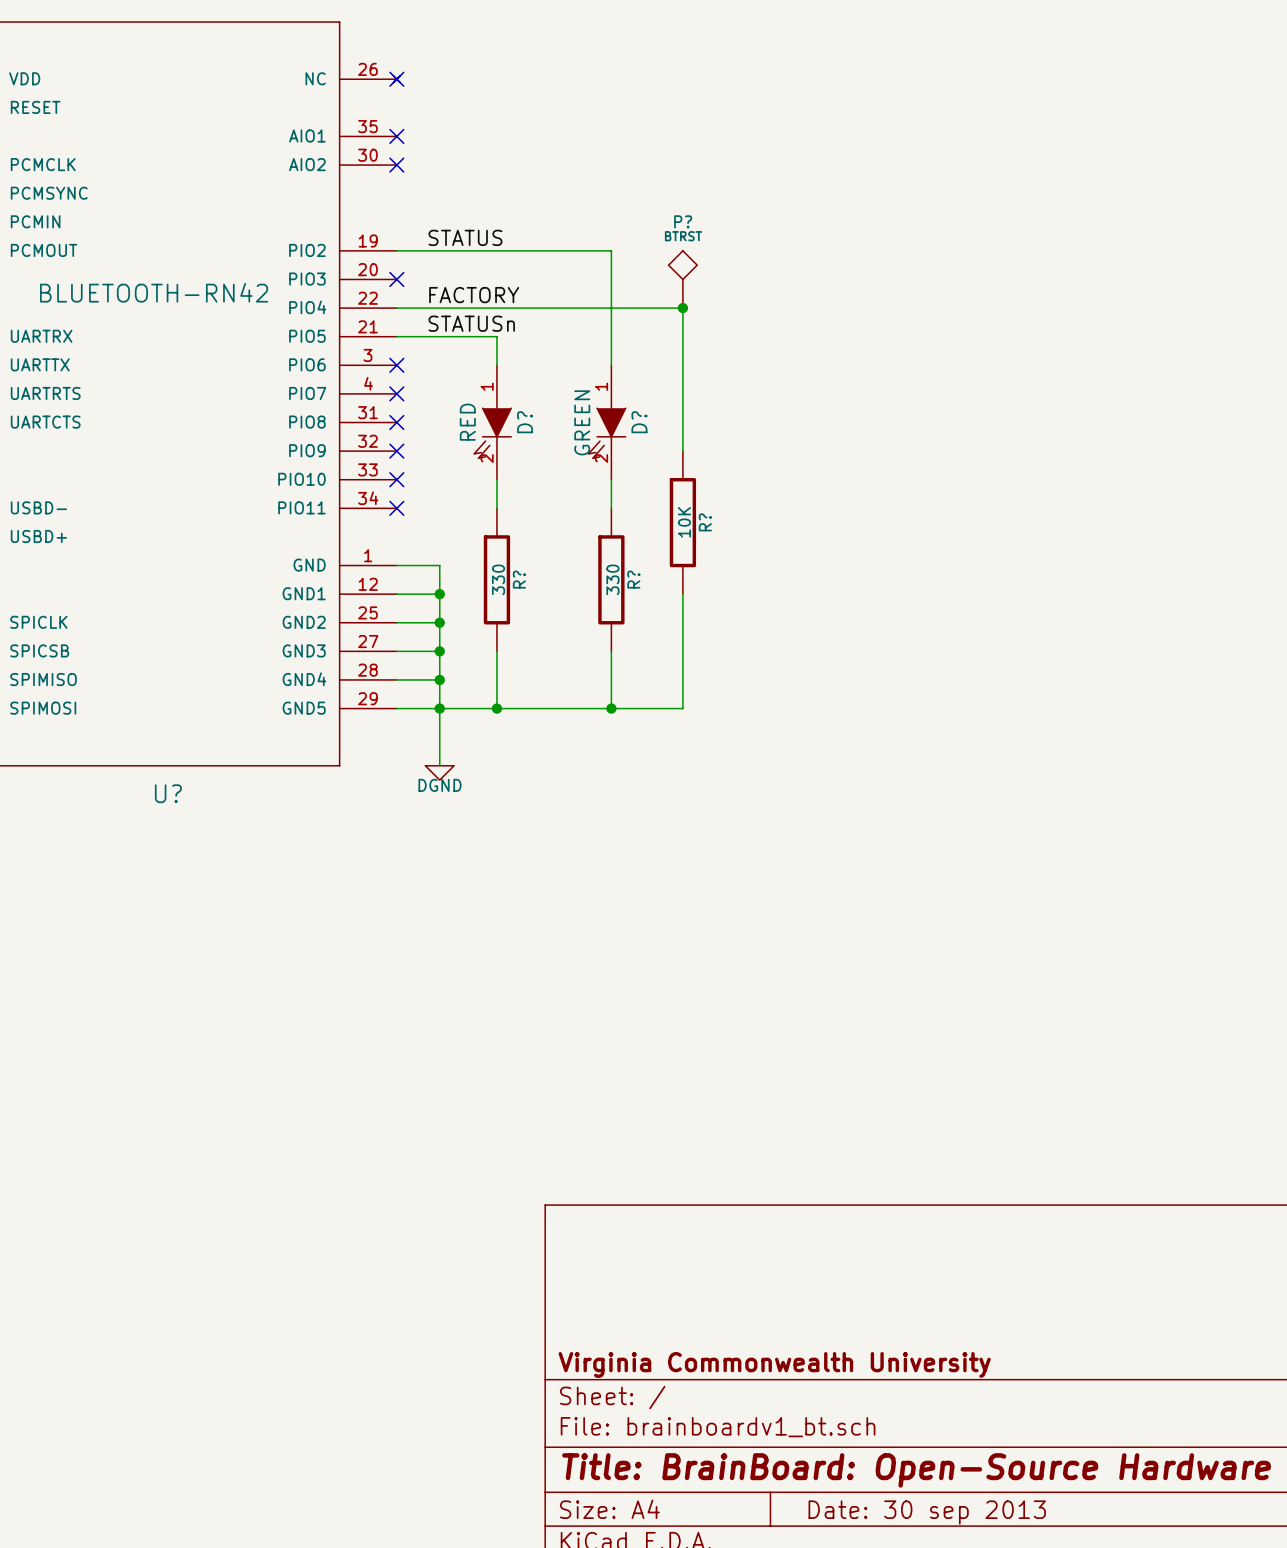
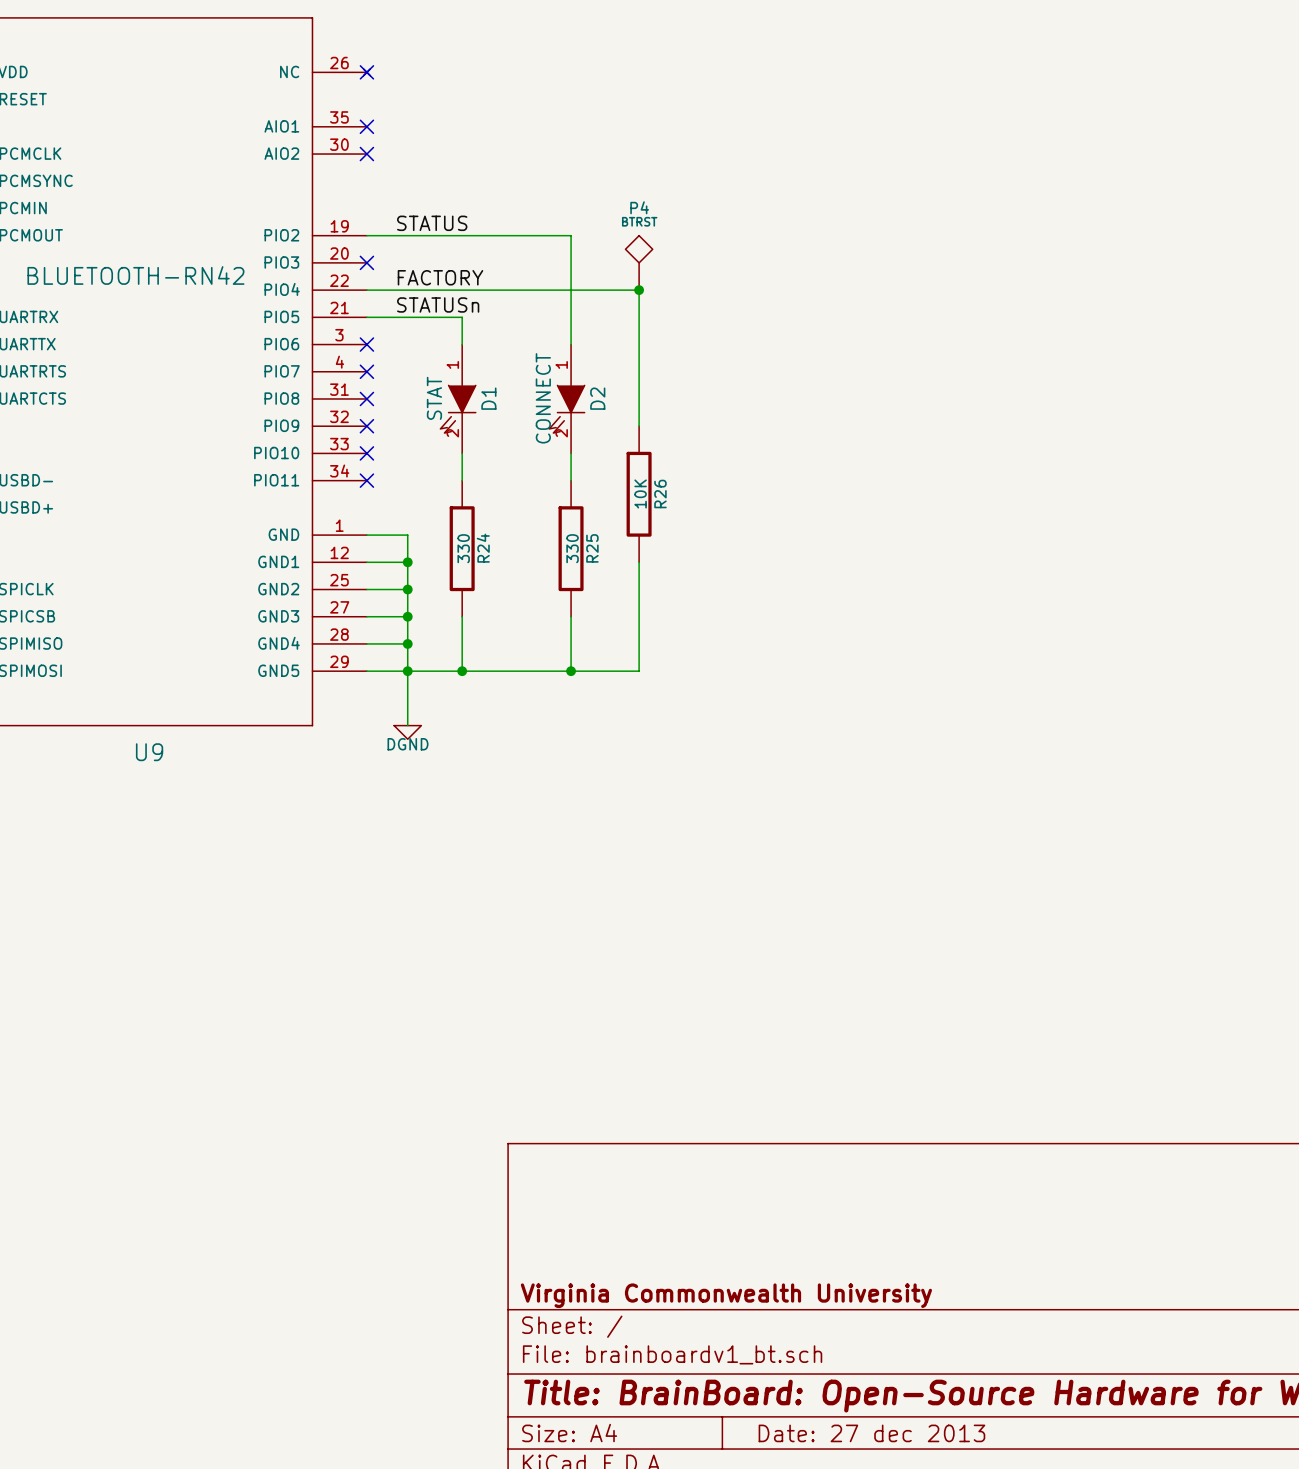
P? name: P? (683, 221) -> P4 (639, 207)
D? value: RED (467, 422) -> STAT (434, 398)
D? name: D? (525, 422) -> D1 (488, 398)
D? value: GREEN (582, 422) -> CONNECT (543, 398)
D? name: D? (639, 422) -> D2 (597, 398)
R? name: R? (705, 522) -> R26 (660, 493)
R? name: R? (519, 579) -> R24 (483, 548)
R? name: R? (633, 579) -> R25 (592, 548)
U? name: U? (168, 793) -> U9 (149, 752)
title block: Date: 30 sep 2013 (927, 1512) -> Date: 27 dec 2013 (871, 1433)

